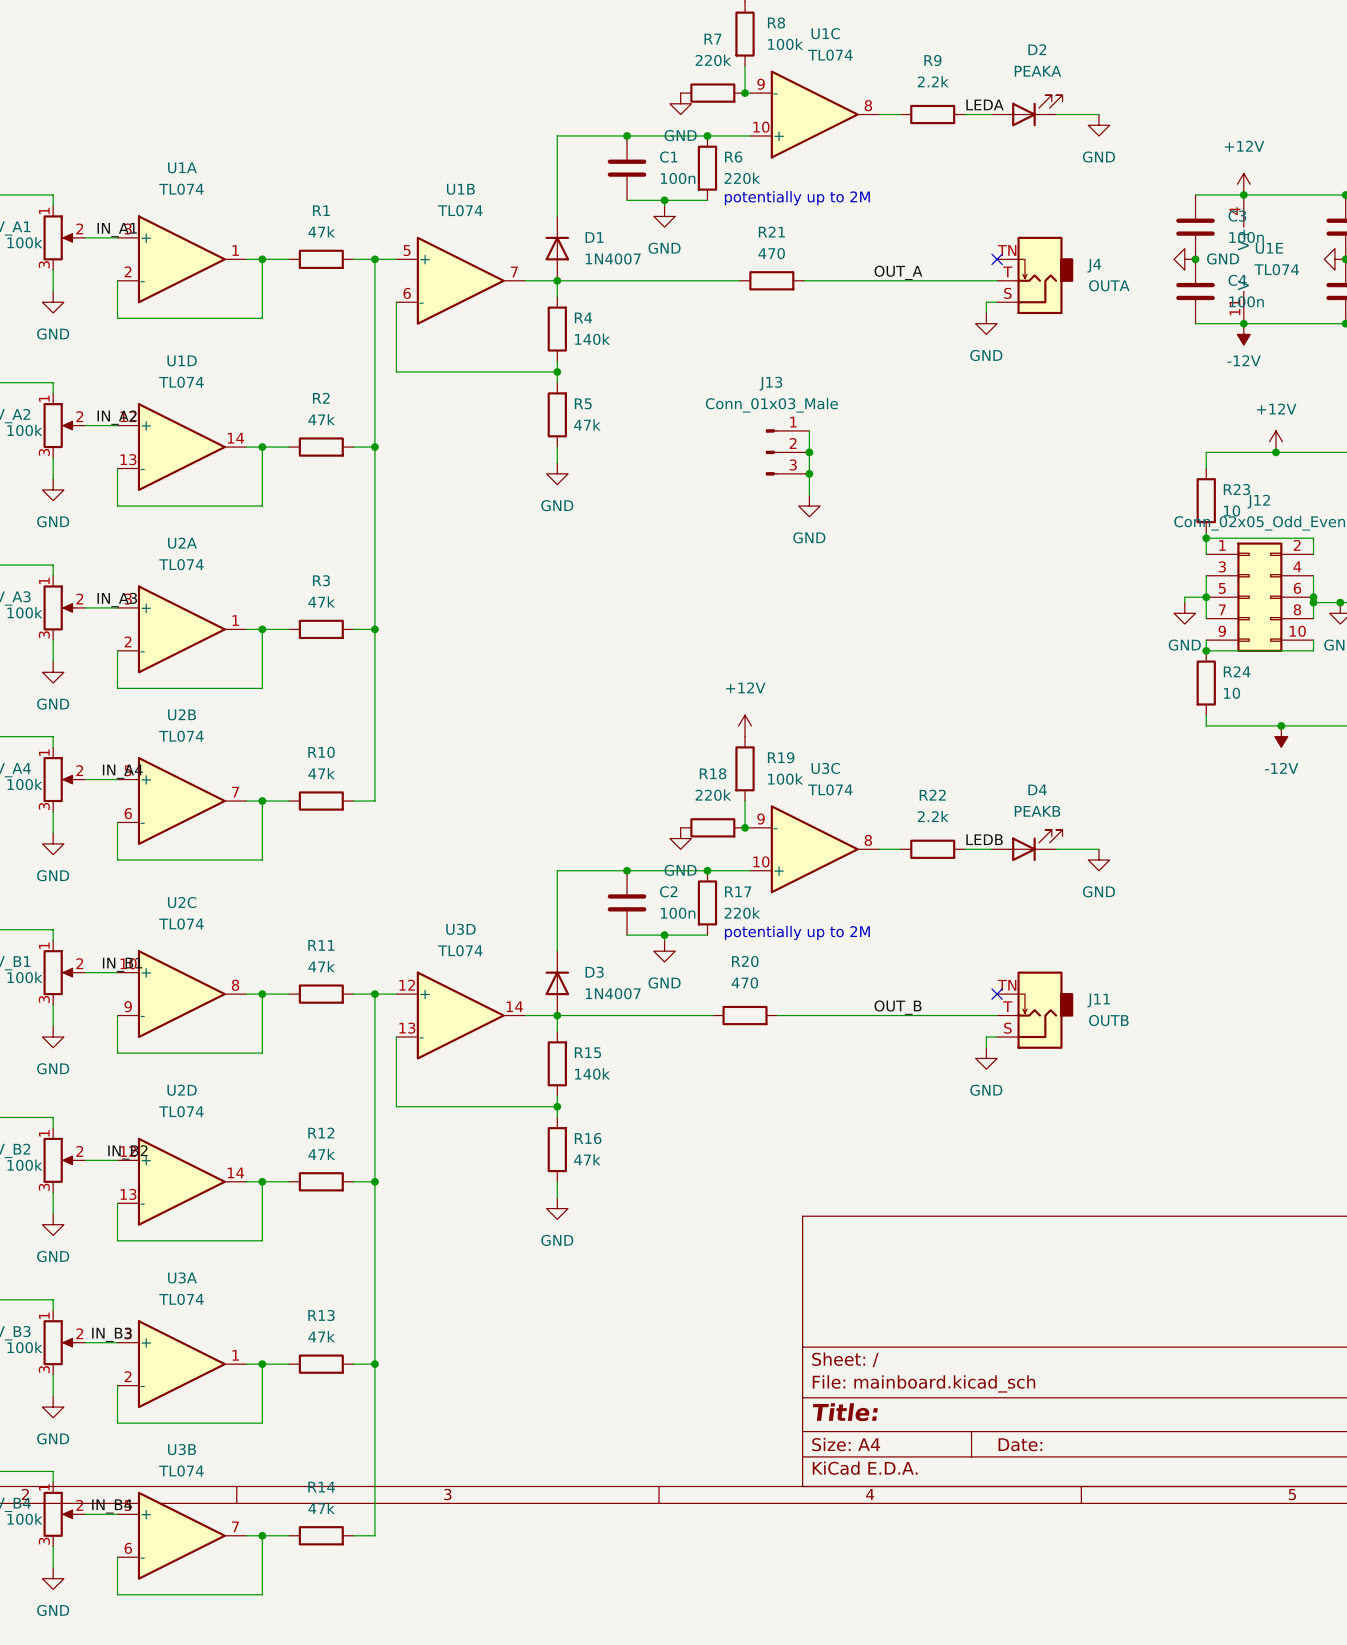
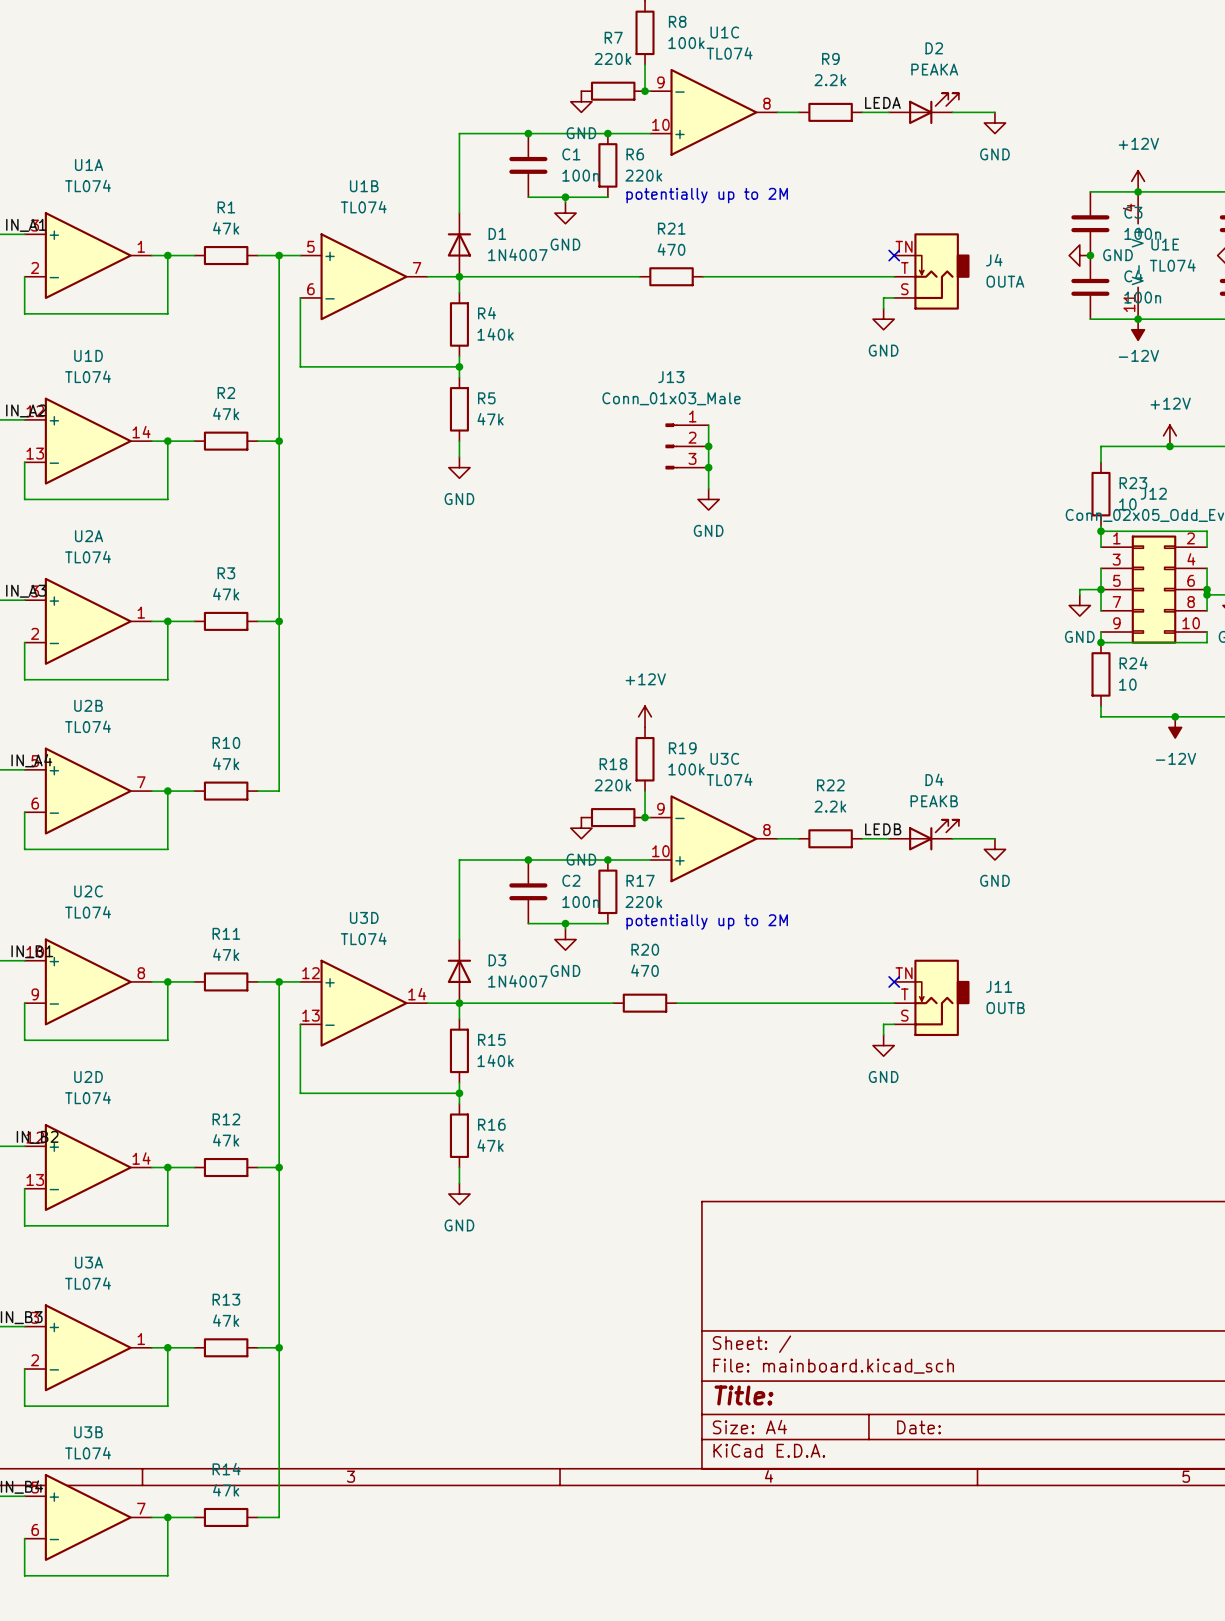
label: OUT_A (898, 272) -> none
label: OUT_B (898, 1007) -> none

